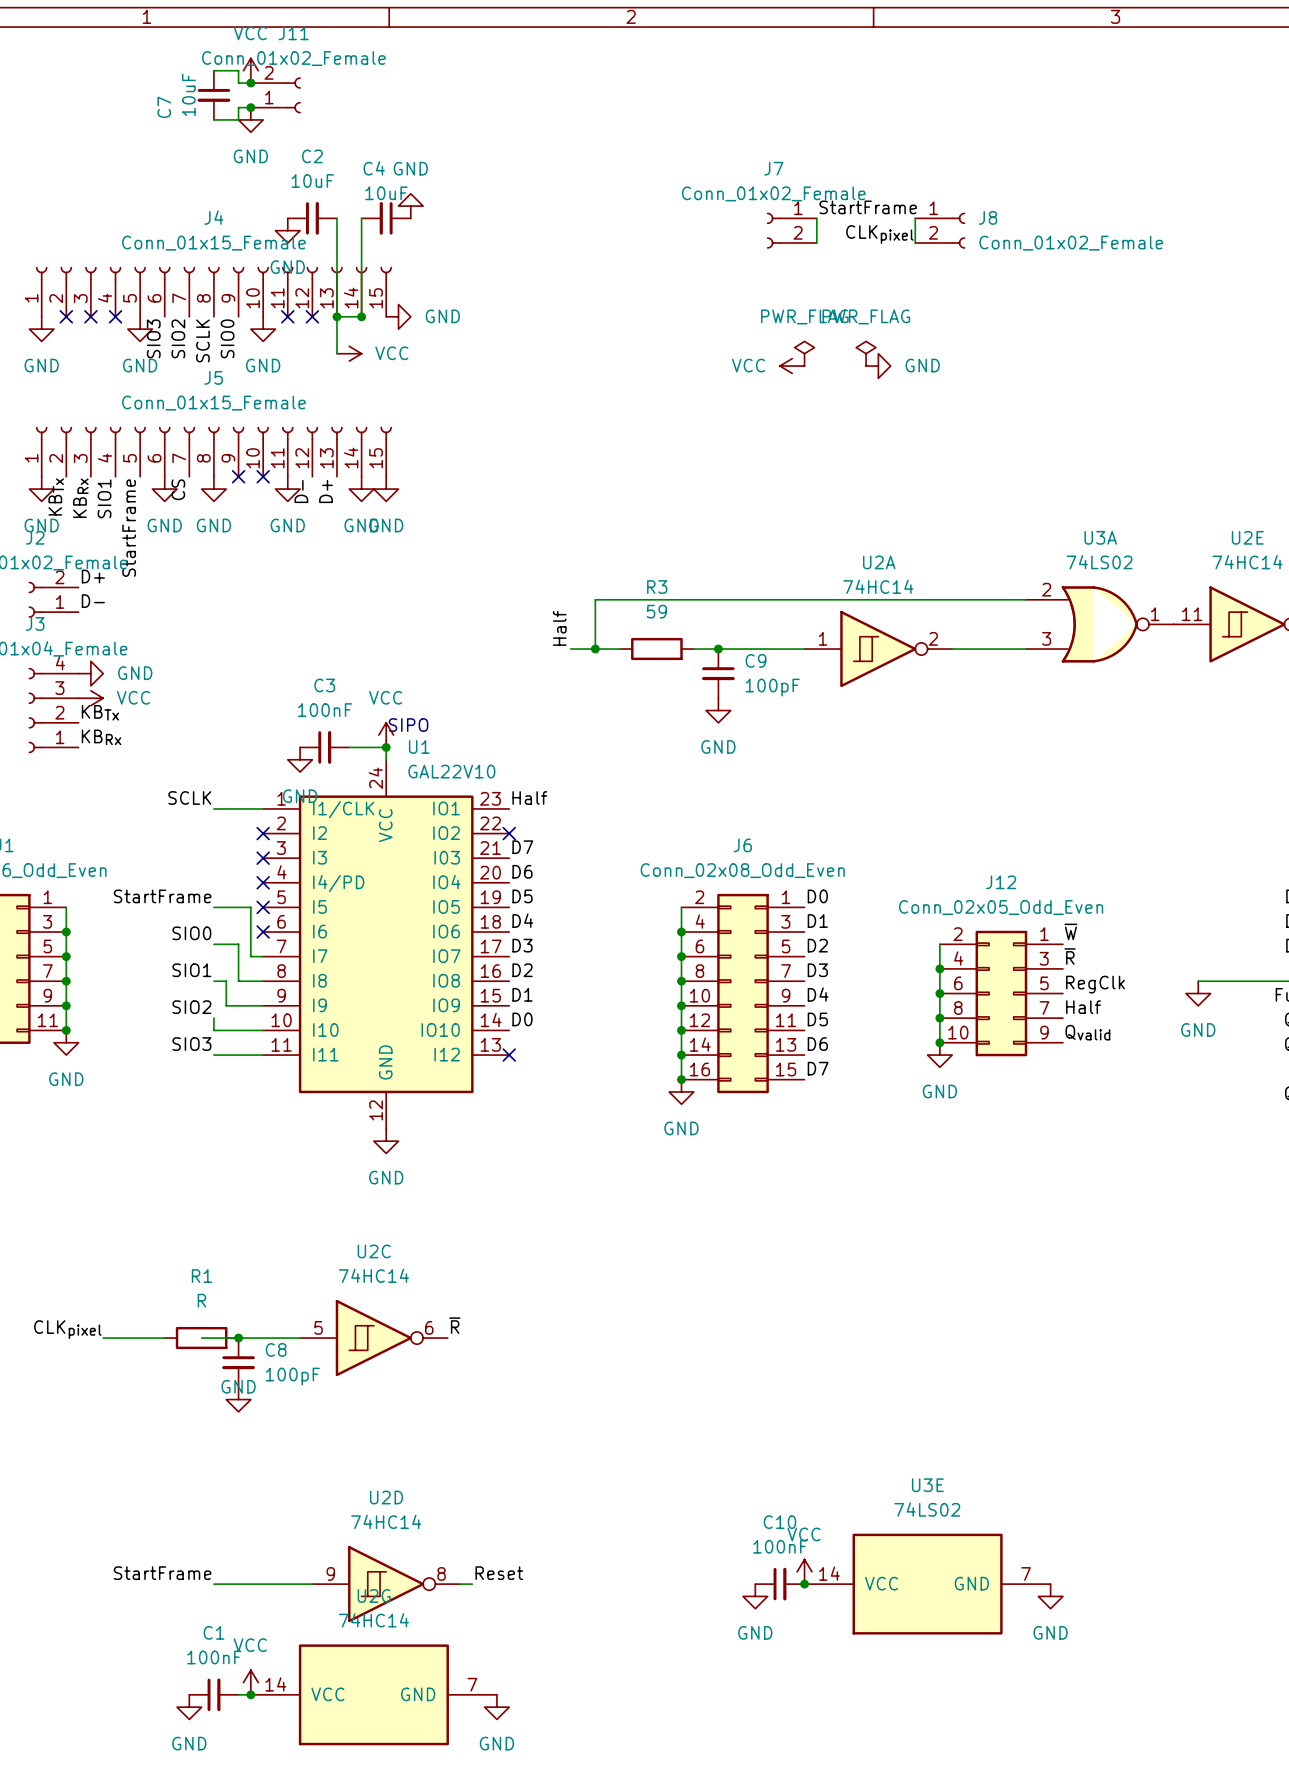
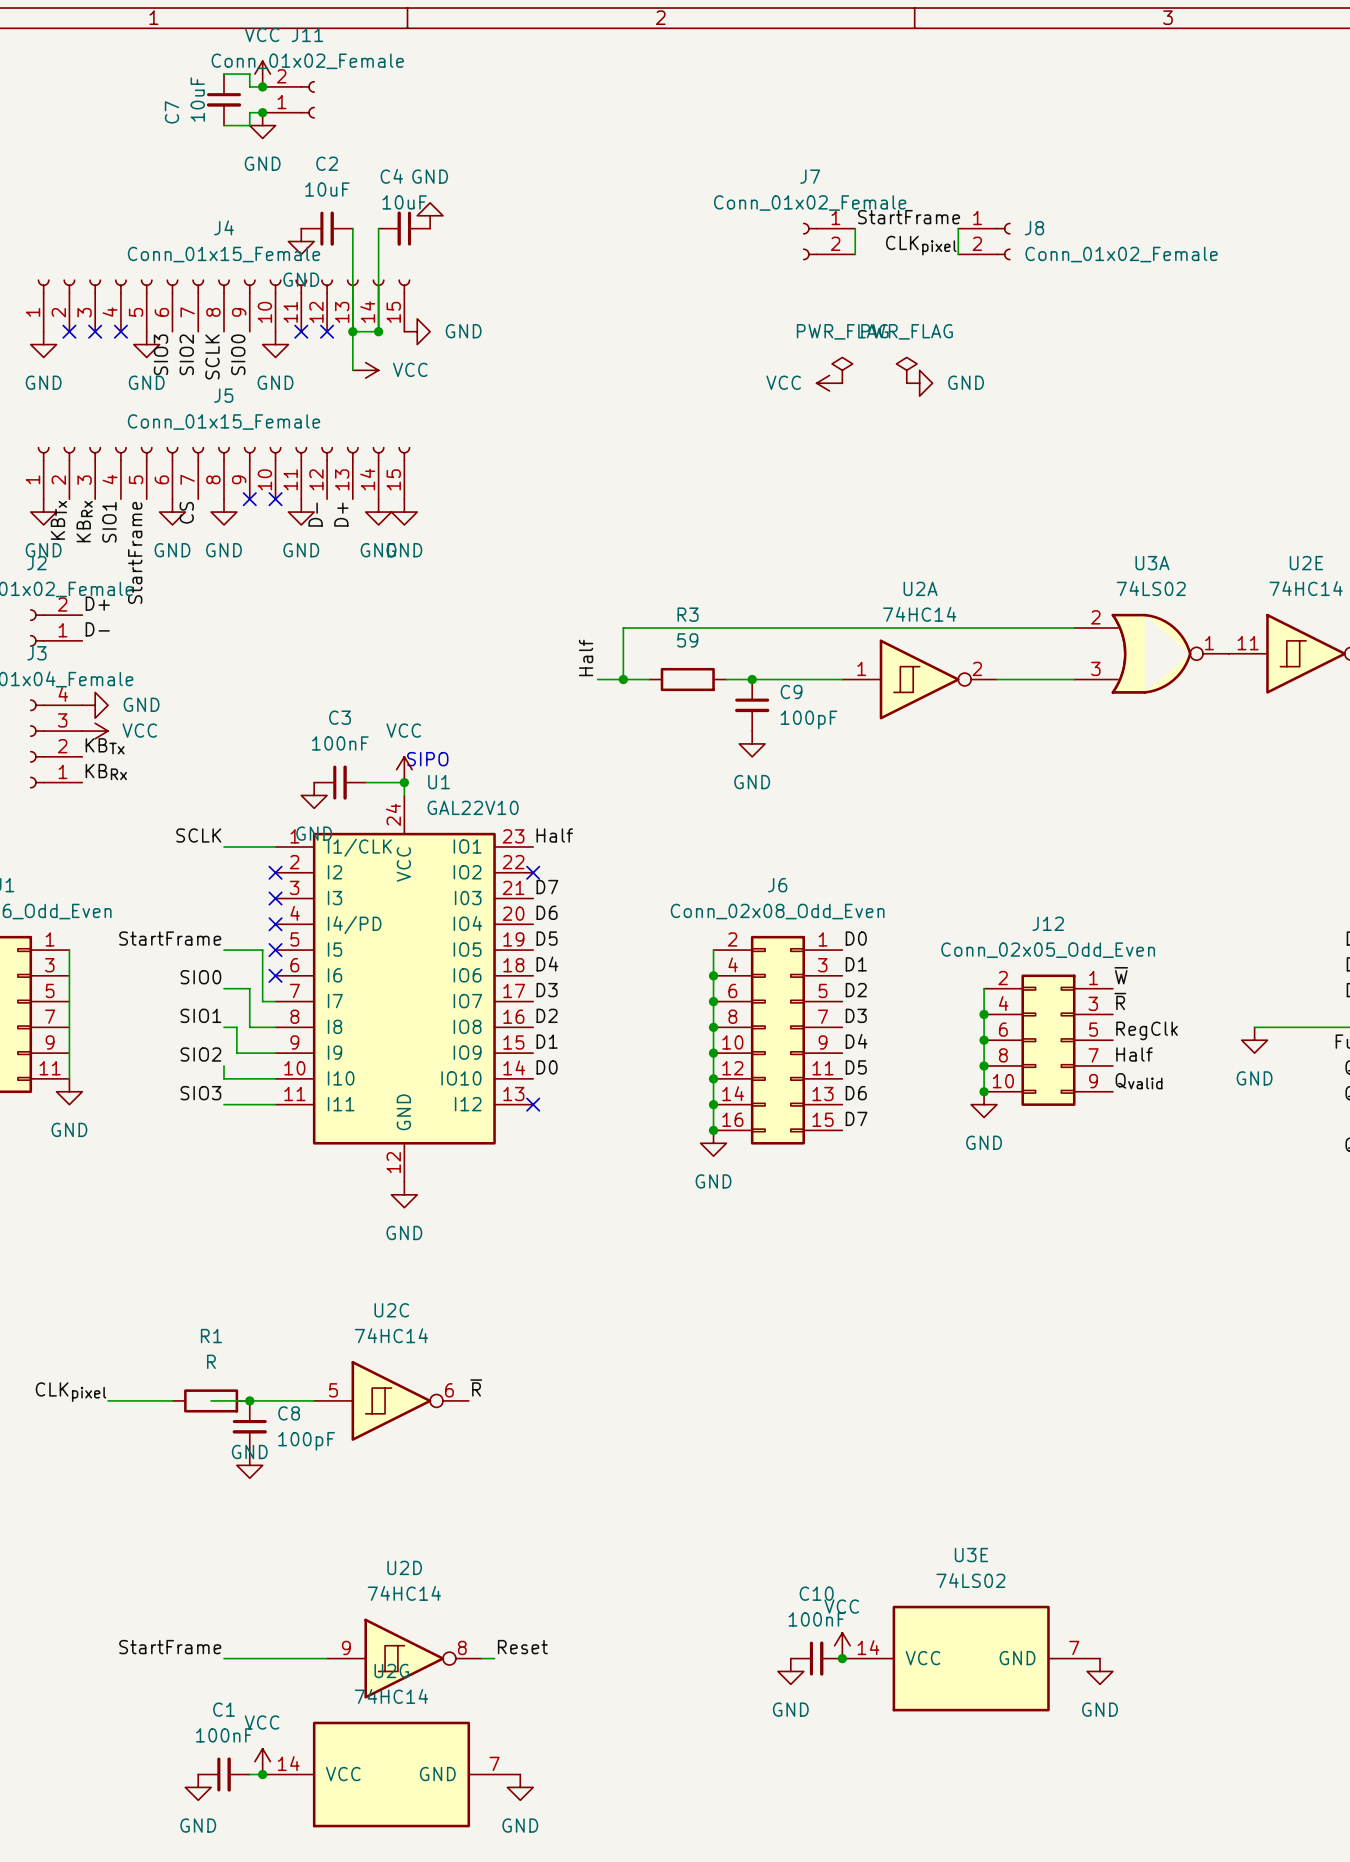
junction: (66, 932) -> none
junction: (66, 956) -> none
junction: (66, 981) -> none
junction: (66, 1005) -> none
junction: (66, 1030) -> none

